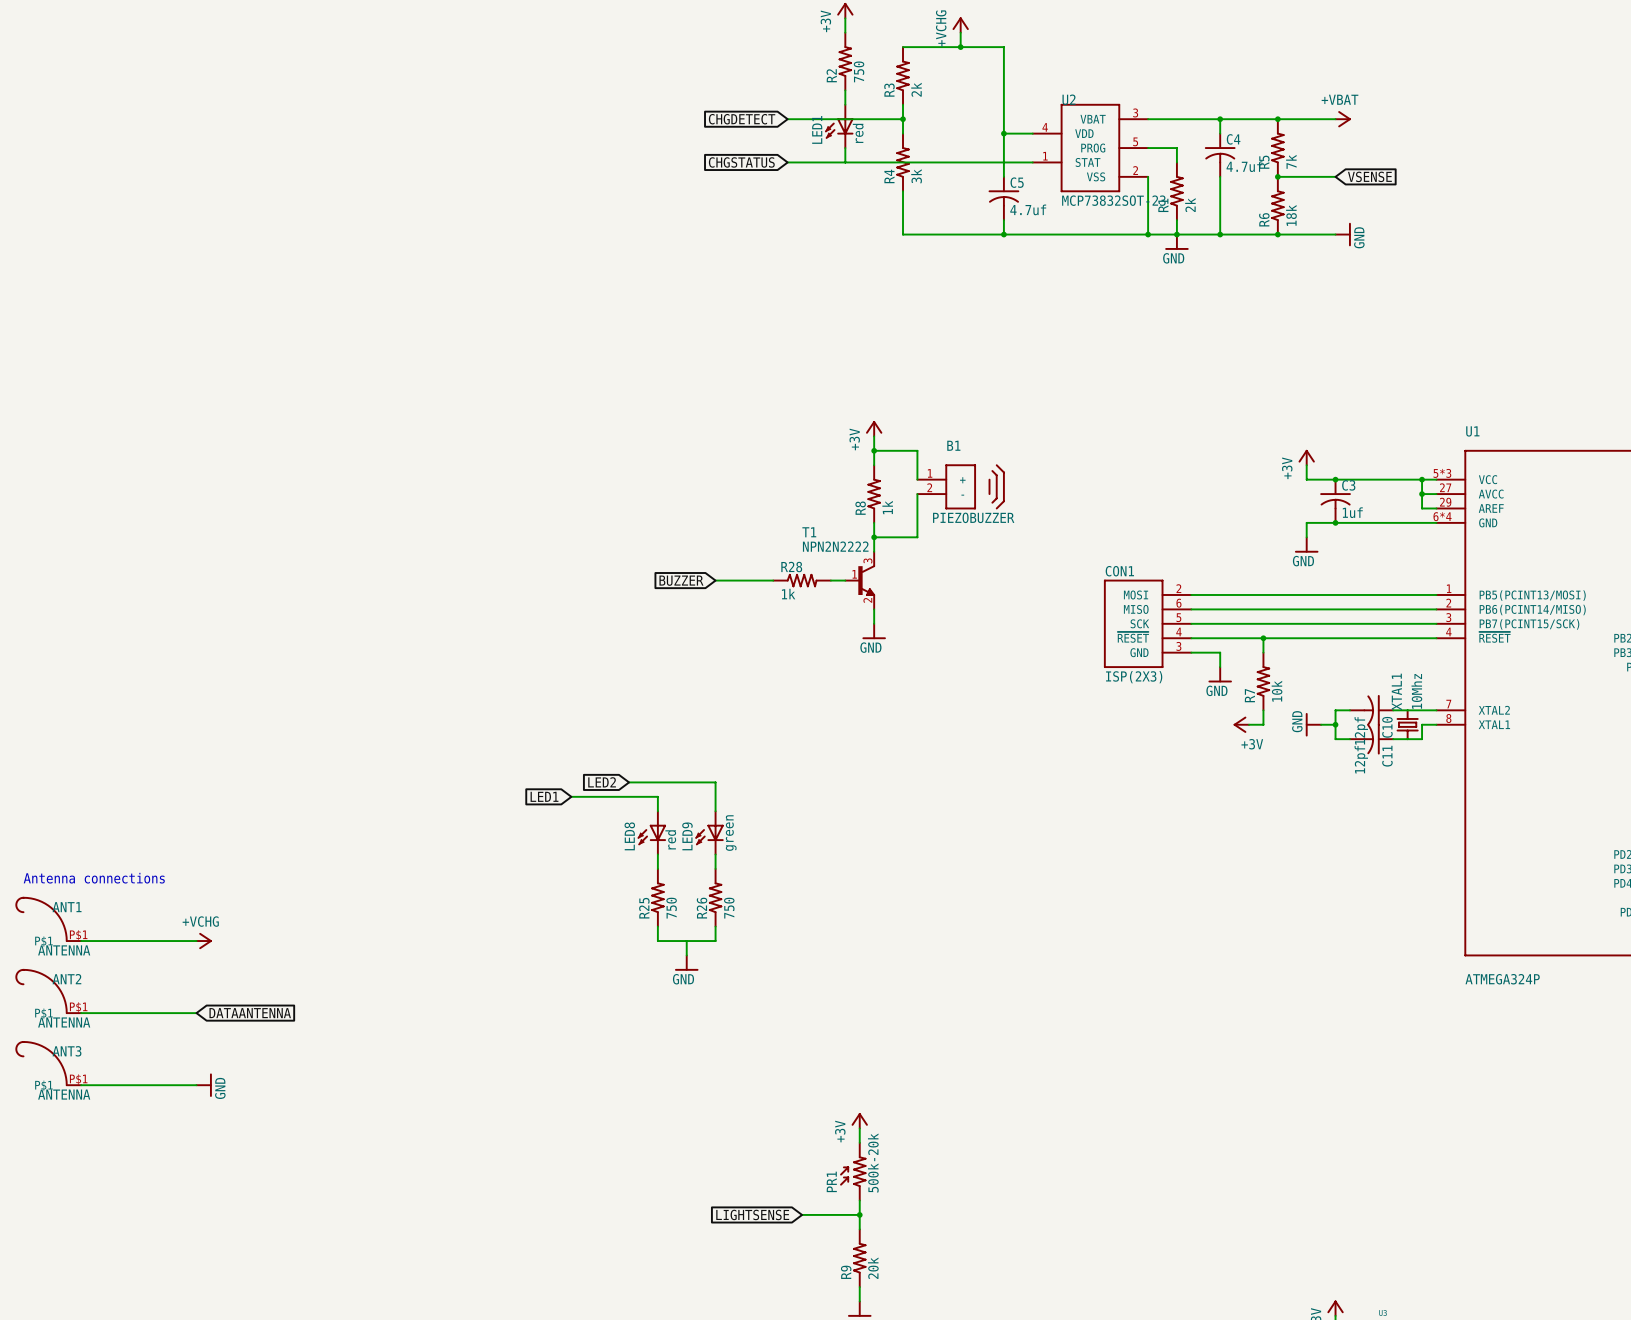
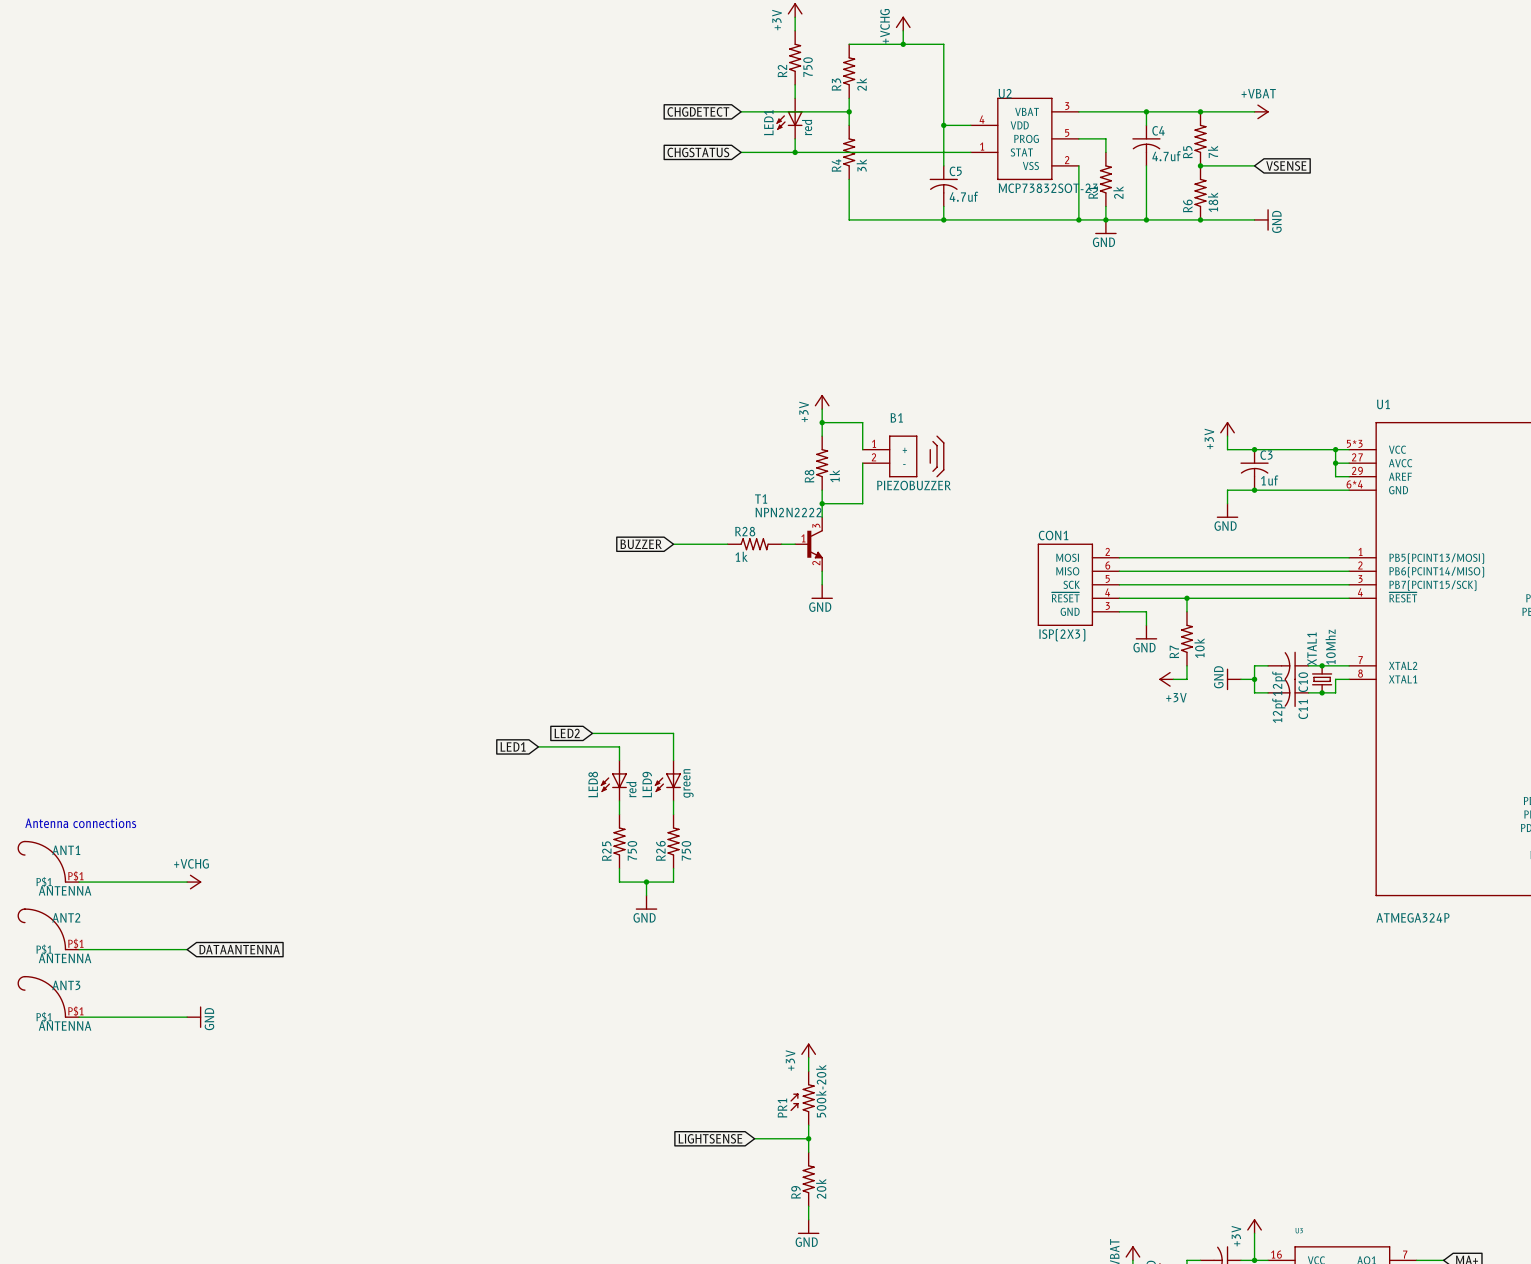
junction: none -> (795, 152)
junction: none -> (1322, 665)
junction: none -> (1322, 692)
junction: none -> (646, 882)

